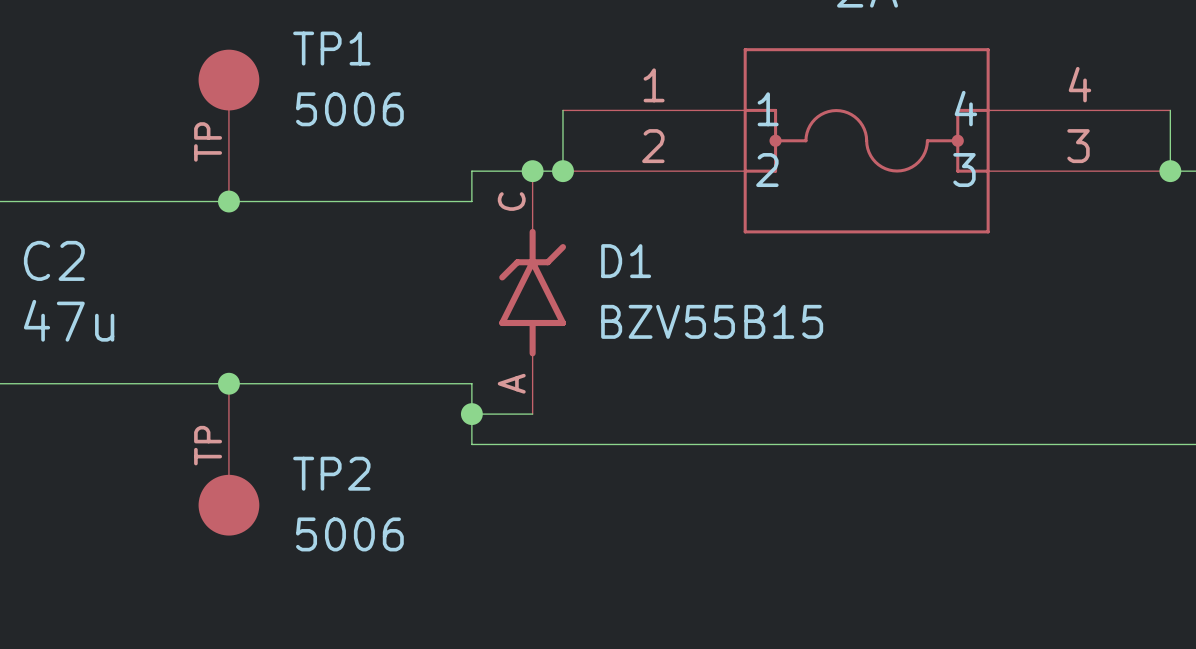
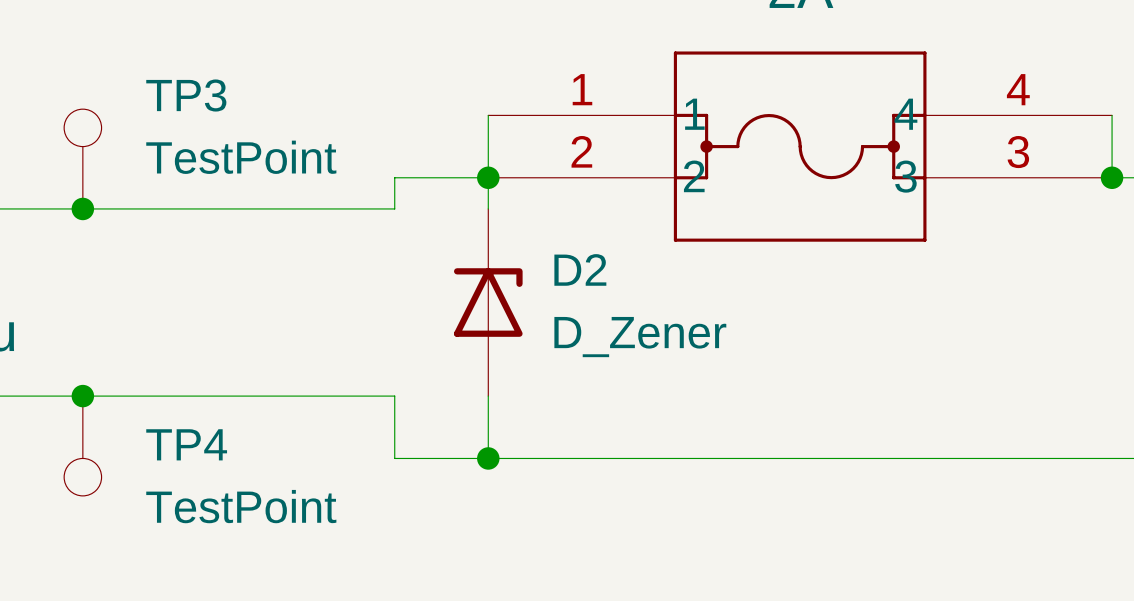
TP1: 5006 (228, 125) -> none
TP3: none -> TestPoint (82, 159)
junction: (532, 171) -> none
wire: none -> (488, 177) (488, 208)
junction position: (228, 201) -> (82, 208)
D1: BZV55B15 (532, 292) -> none
D2: none -> D_Zener (488, 302)
junction position: (228, 383) -> (82, 396)
wire: none -> (488, 396) (488, 458)
wire: (471, 414) (532, 414) -> none
junction position: (471, 414) -> (488, 458)
TP4: none -> TestPoint (82, 445)
TP2: 5006 (228, 459) -> none

